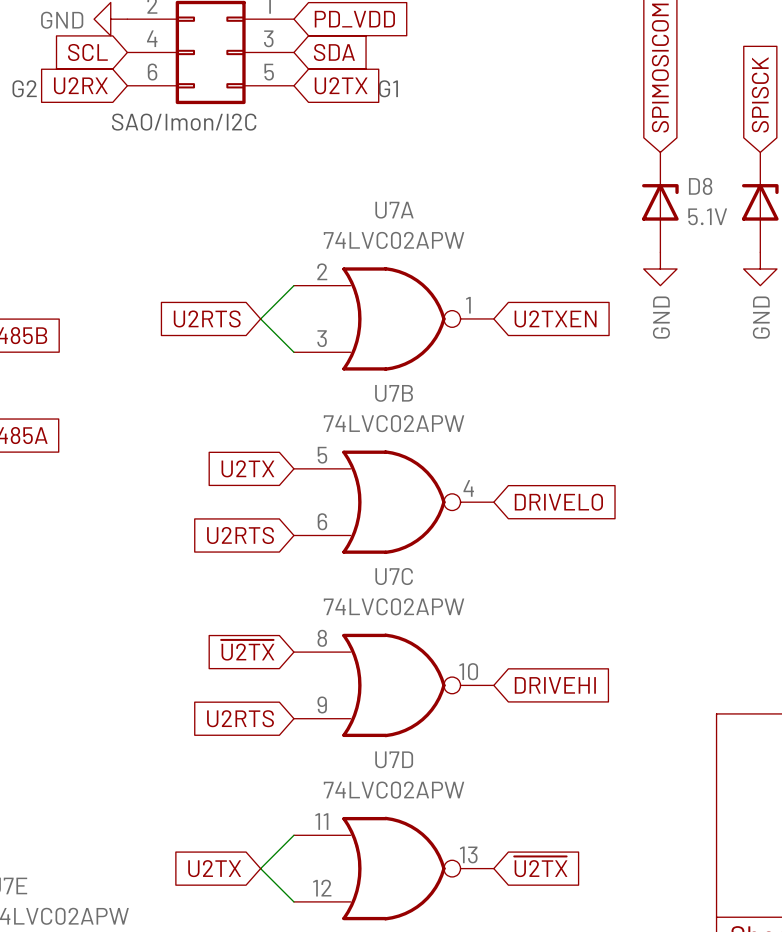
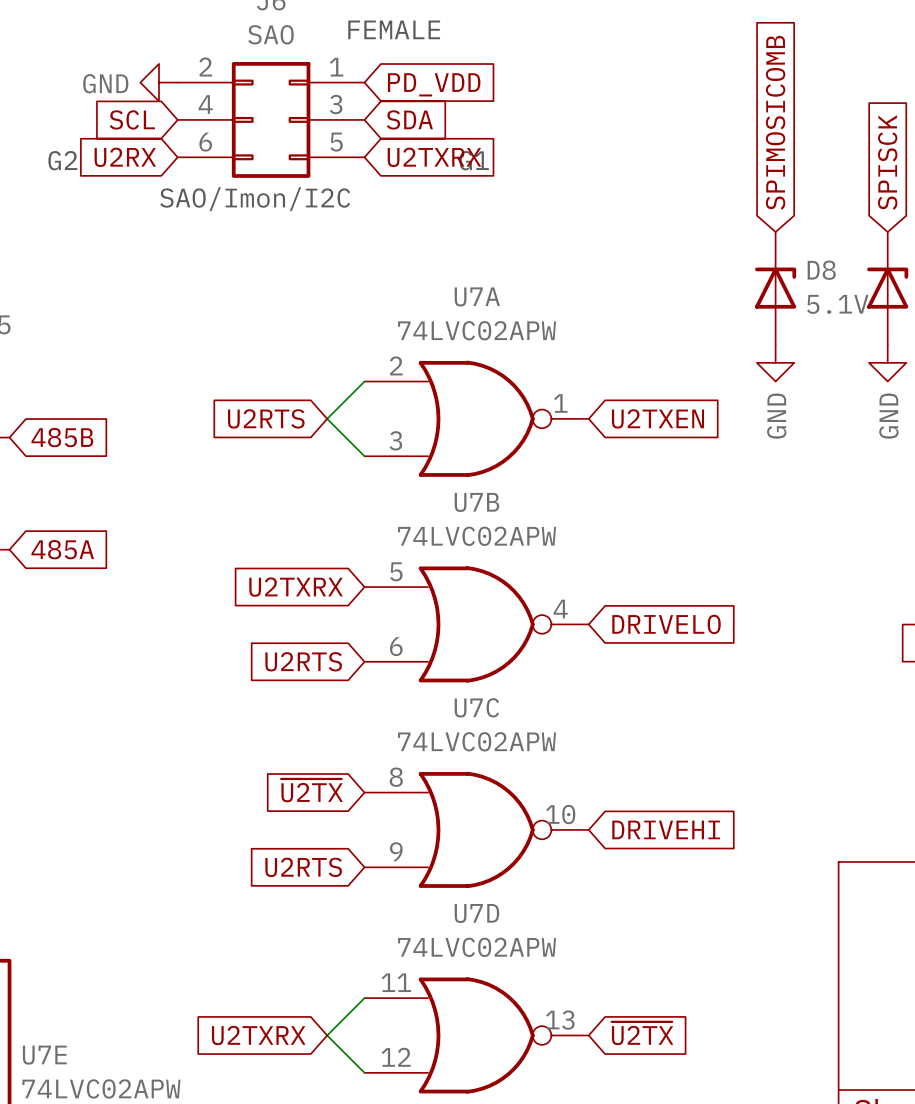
global label: U2TX (341, 85) -> U2TXRX (434, 157)
global label: U2TX (247, 468) -> U2TXRX (296, 587)
global label: U2TX (214, 868) -> U2TXRX (258, 1035)

